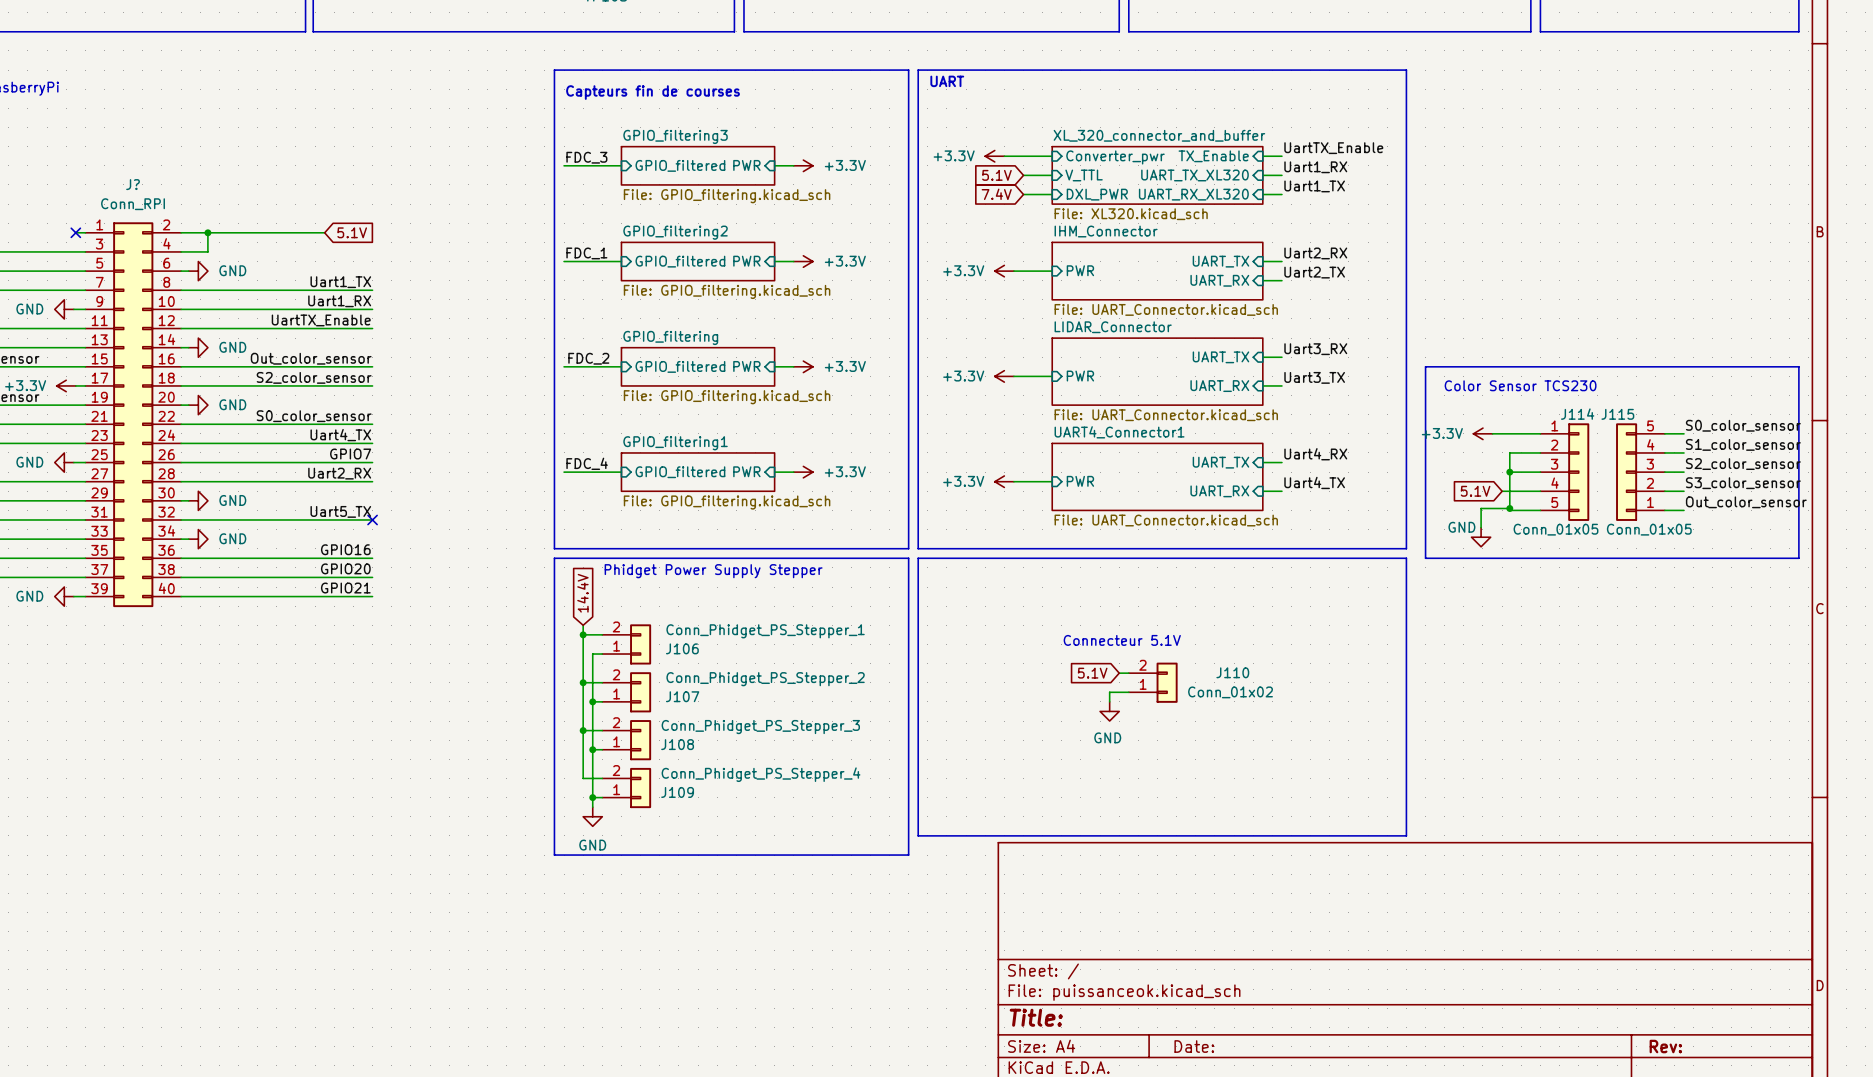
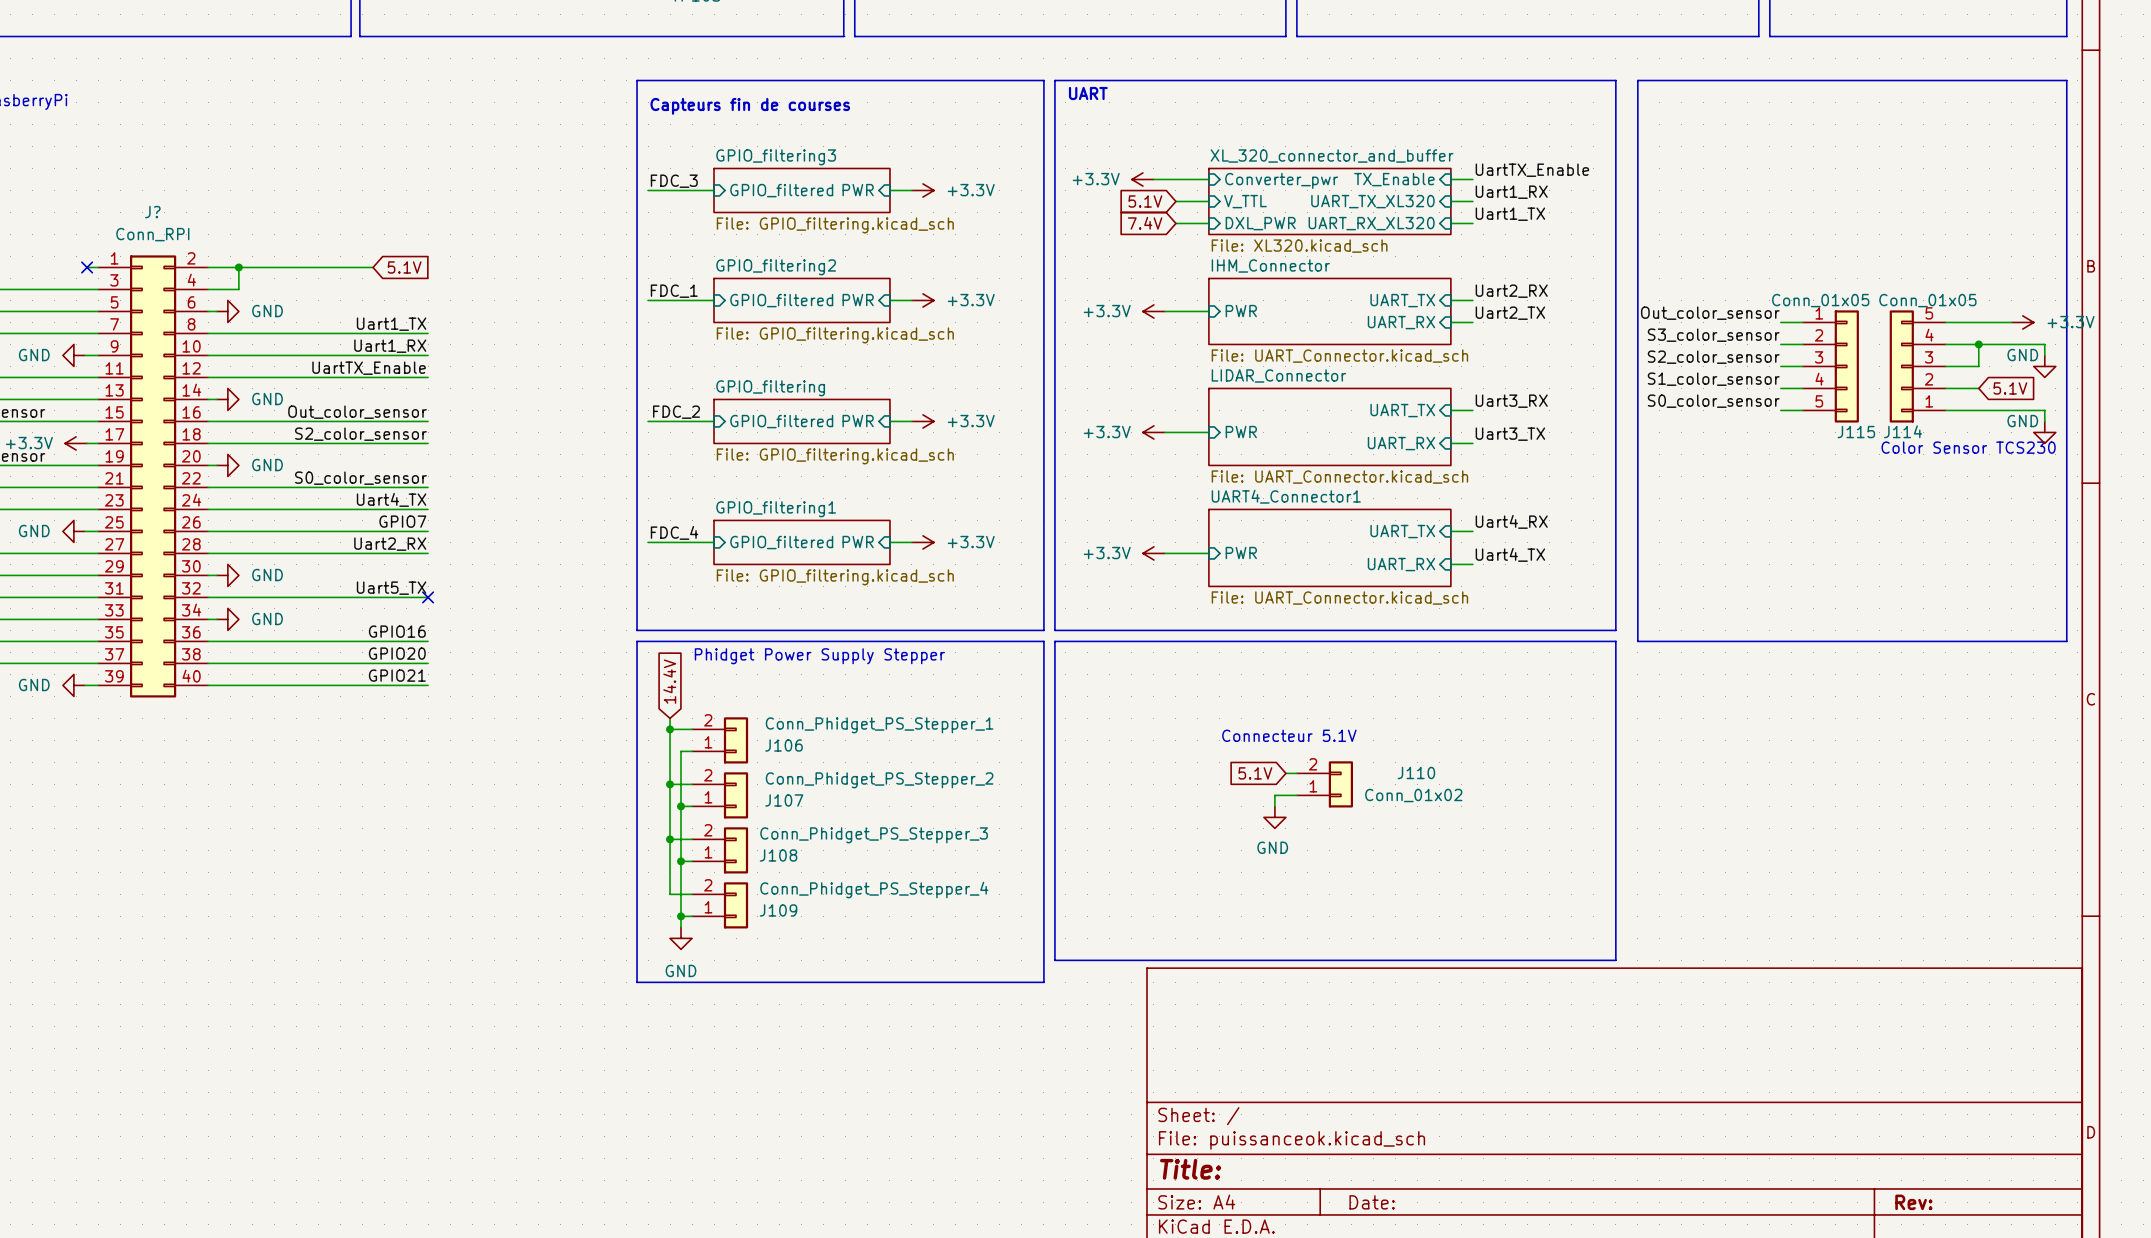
label: none -> Out_color_sensor (1710, 313)
wire: none -> (1780, 322) (1802, 322)
wire: none -> (1945, 322) (2011, 322)
power symbol: none -> +3.3V (2022, 322)
label: none -> S3_color_sensor (1713, 335)
wire: none -> (1945, 344) (2044, 344) (2044, 355)
wire: none -> (1978, 344) (1978, 366) (1945, 366)
junction: none -> (1978, 344)
label: none -> S2_color_sensor (1713, 357)
power symbol: none -> GND (2044, 366)
wire: none -> (1945, 388) (1978, 388)
global label: none -> 5.1V (2010, 388)
wire: none -> (1945, 410) (2044, 410) (2044, 421)
line: (1425, 366) (1798, 366) -> (1637, 421) (1637, 80) (2066, 80) (2066, 421)
power symbol: none -> GND (2044, 432)
text: Color Sensor TCS230 (1520, 385) -> none
text: none -> Color Sensor TCS230 (1968, 447)
label position: S0_color_sensor (1743, 425) -> S0_color_sensor (1713, 401)
power symbol: +3.3V (1482, 433) -> none
wire: (1492, 433) (1540, 433) -> none
wire: (1664, 433) (1684, 433) -> (1780, 344) (1802, 344)
label position: S1_color_sensor (1743, 444) -> S1_color_sensor (1713, 379)
wire: (1540, 452) (1509, 452) (1509, 510) (1540, 510) -> none
wire: (1664, 452) (1684, 452) -> (1780, 366) (1802, 366)
label: S2_color_sensor (1743, 464) -> none
wire: (1509, 472) (1540, 472) -> none
junction: (1509, 472) -> none
J114 position: (1564, 472) -> (1917, 366)
J114 rotation: 0° (1578, 472) -> 180° (1901, 366)
J115 rotation: 0° (1626, 472) -> 180° (1846, 366)
J115 position: (1640, 472) -> (1830, 366)
wire: (1664, 472) (1684, 472) -> (1780, 388) (1802, 388)
label: S3_color_sensor (1743, 483) -> none
global label: 5.1V (1475, 491) -> none
wire: (1502, 491) (1540, 491) -> none
wire: (1664, 491) (1684, 491) -> (1780, 410) (1802, 410)
label: Out_color_sensor (1746, 502) -> none
wire: (1509, 508) (1481, 508) (1481, 527) -> none
junction: (1509, 508) -> none
wire: (1664, 510) (1684, 510) -> none
power symbol: GND (1481, 537) -> none

